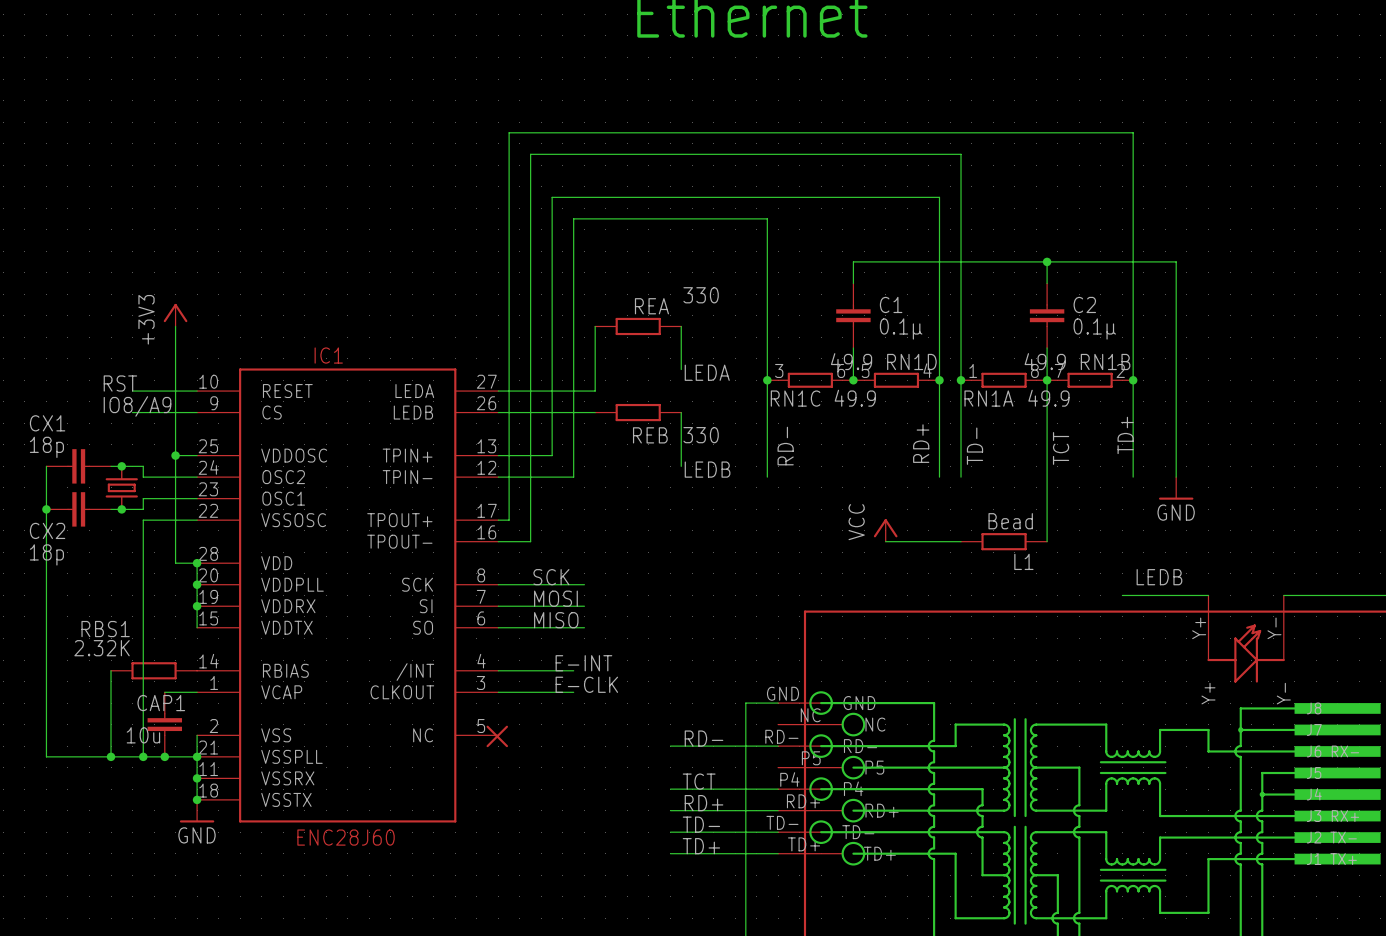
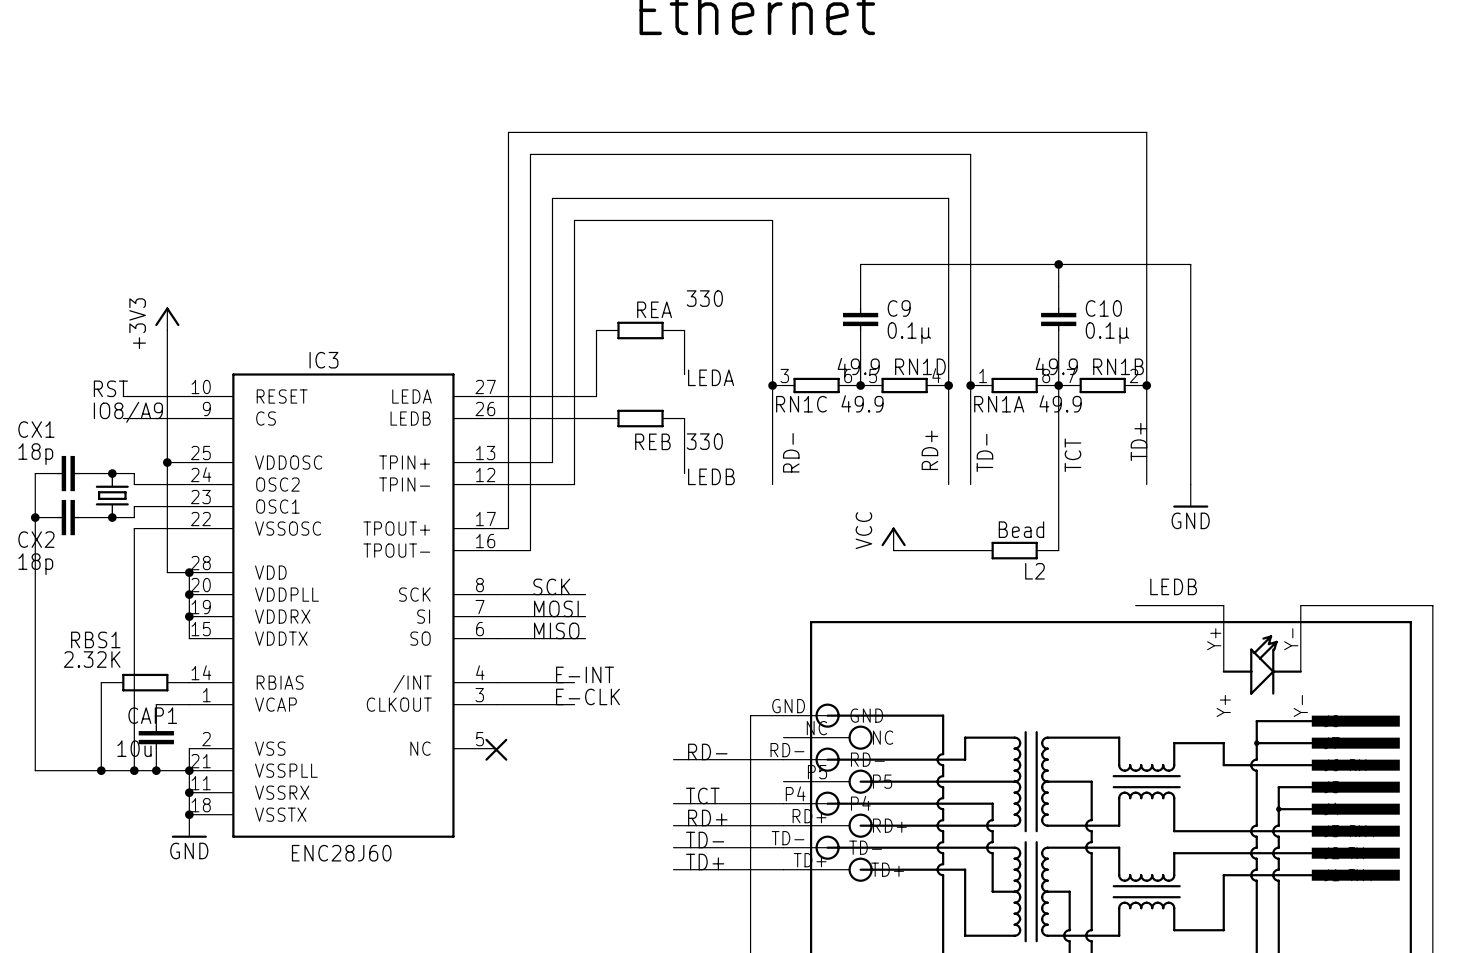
C1 name: C1 (891, 304) -> C9 (899, 308)
C2 name: C2 (1084, 304) -> C10 (1103, 308)
IC1 name: IC1 (328, 355) -> IC3 (323, 360)
L1 name: L1 (1023, 561) -> L2 (1034, 571)

